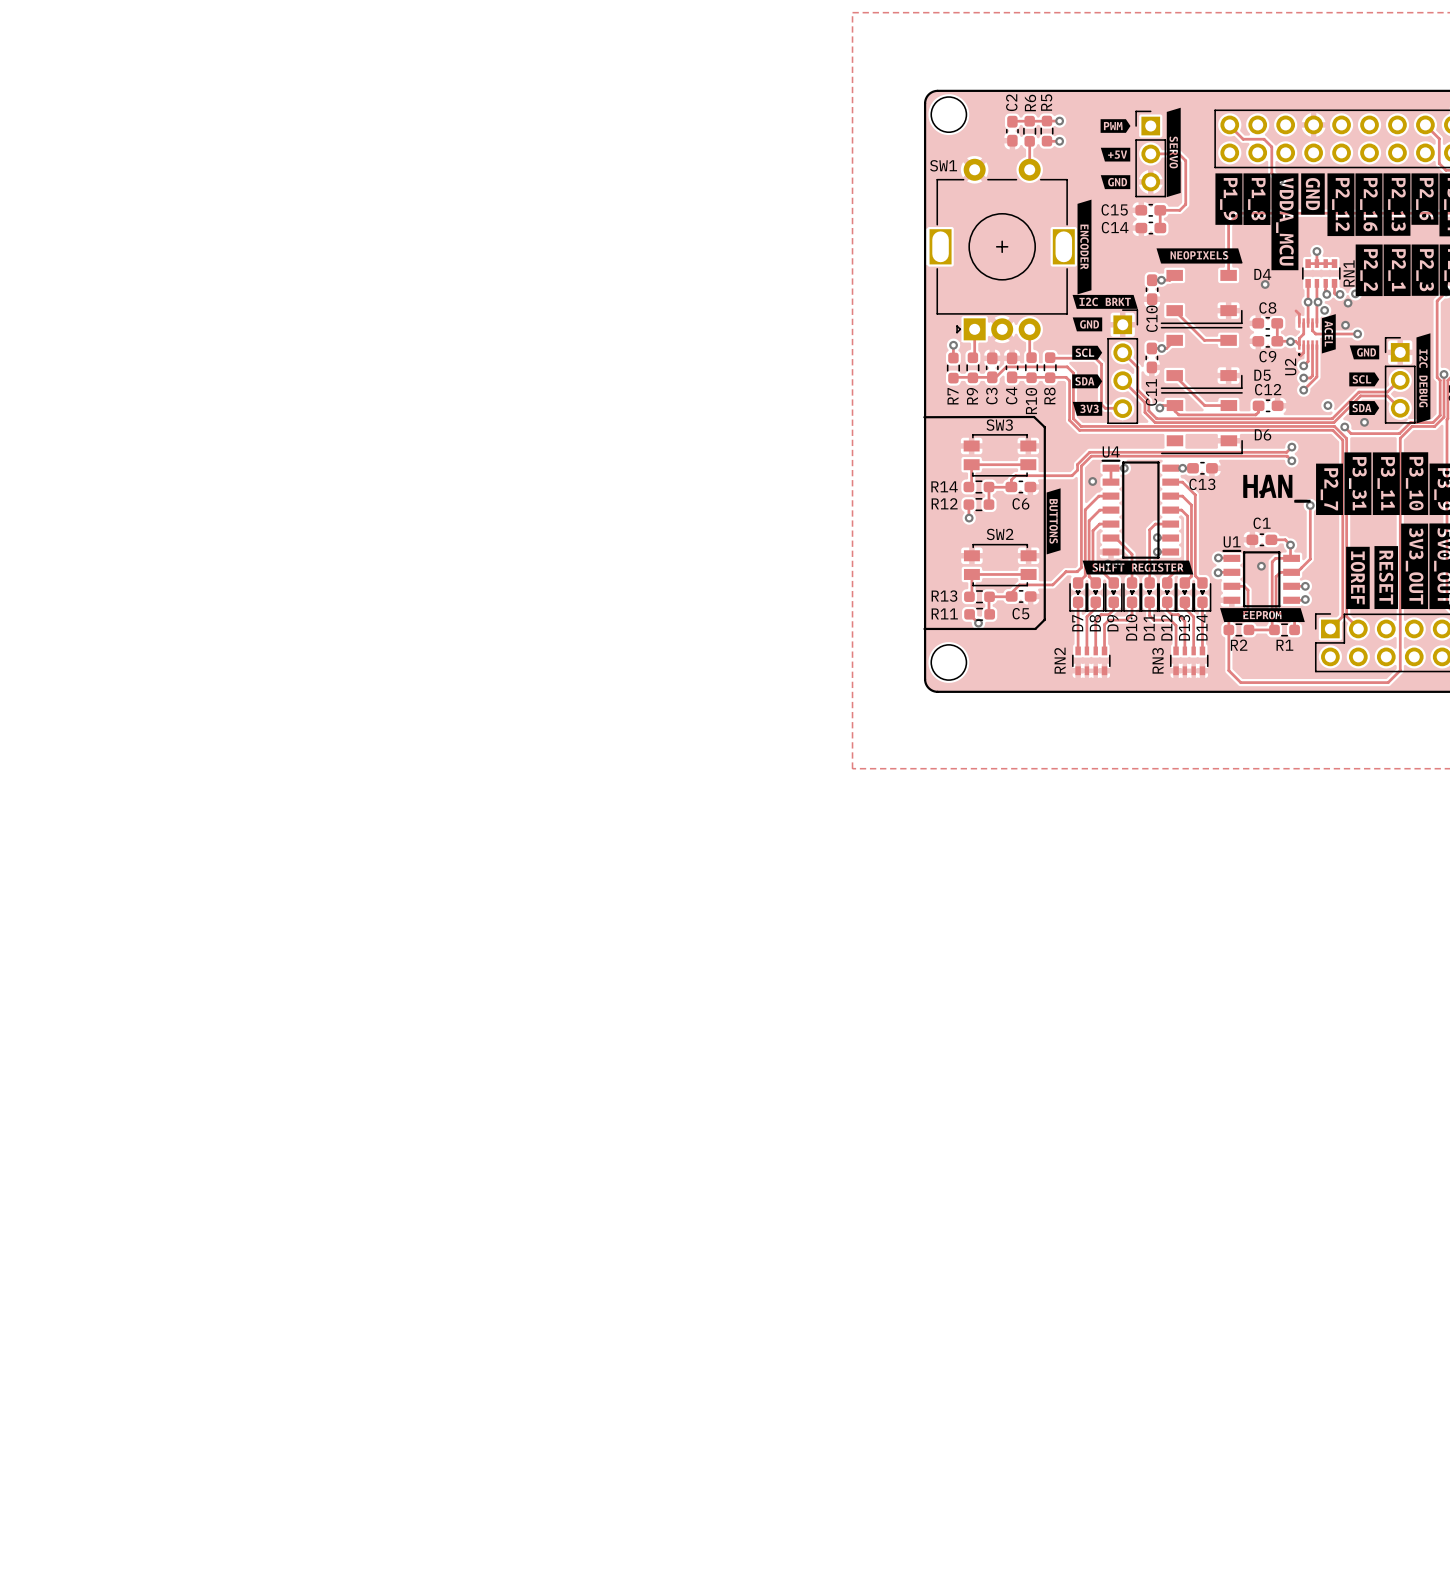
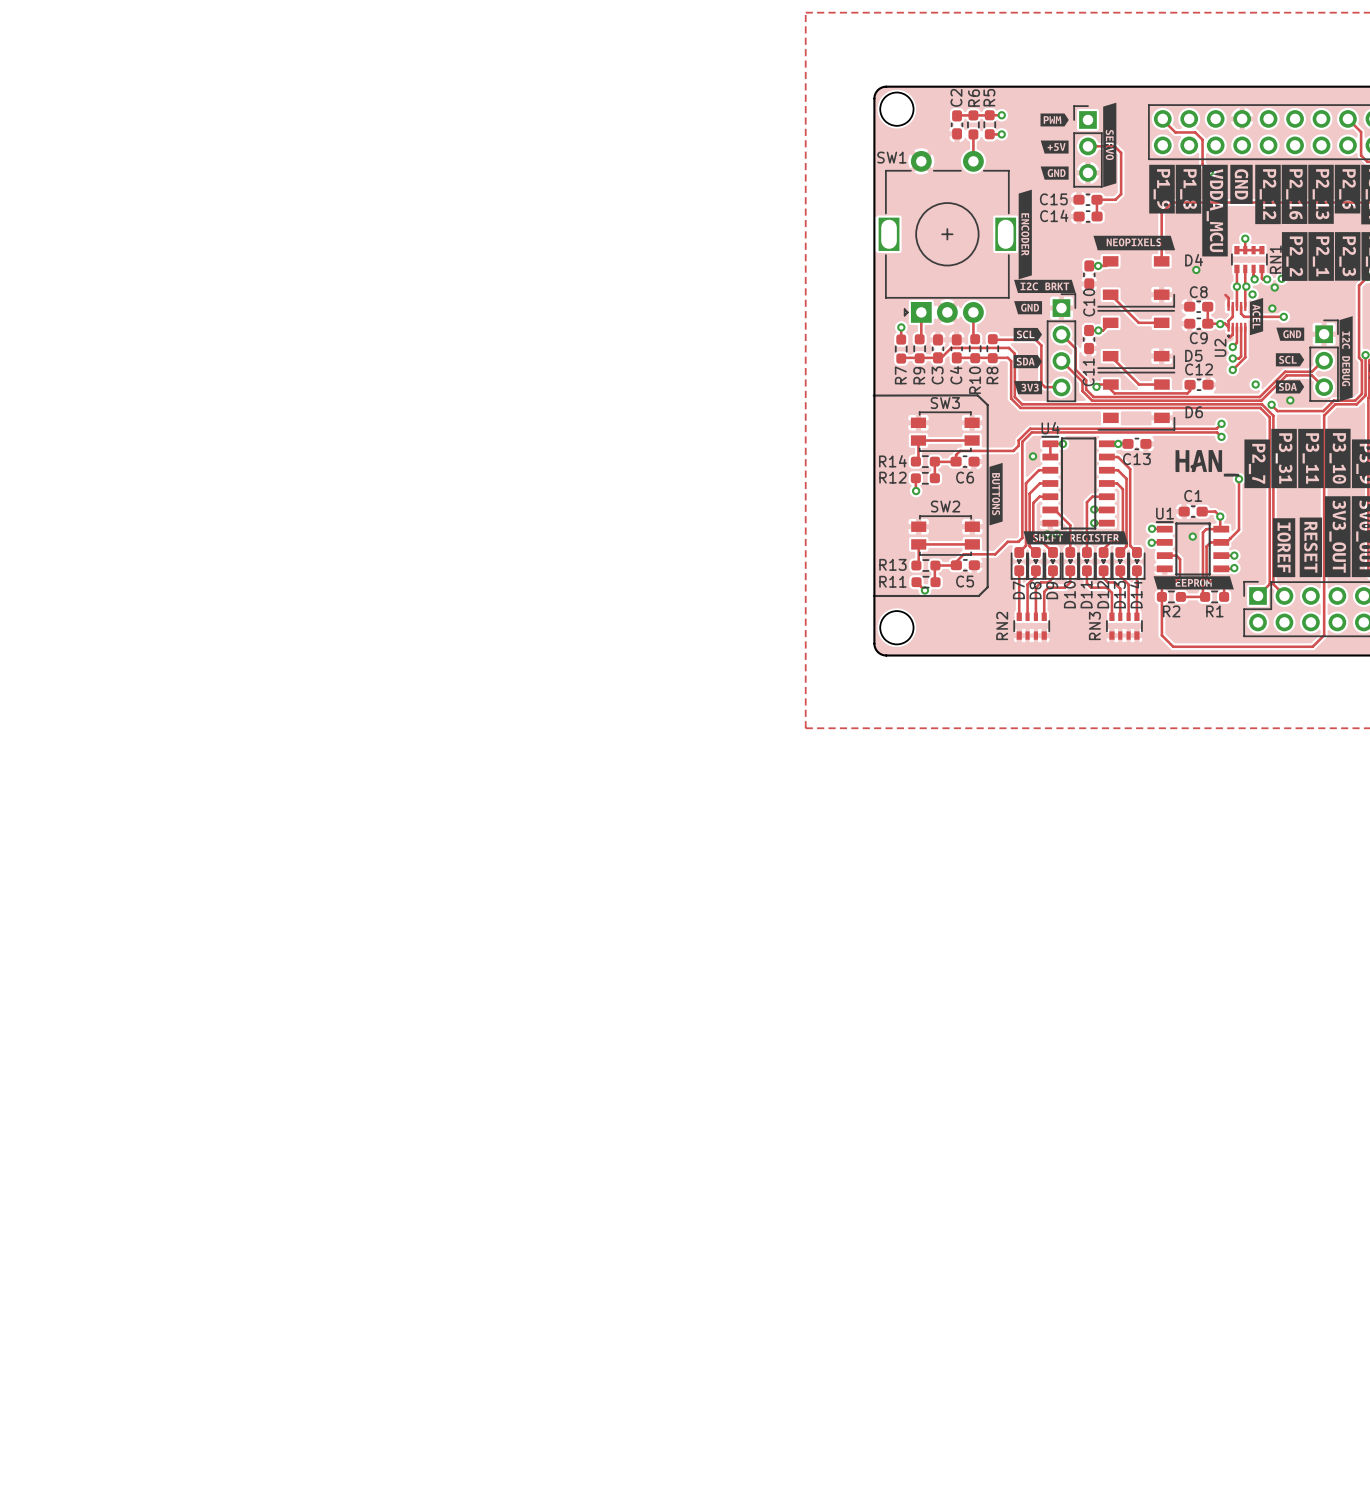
part footprint: [1384, 337, 1416, 424] -> [1309, 319, 1339, 402]

